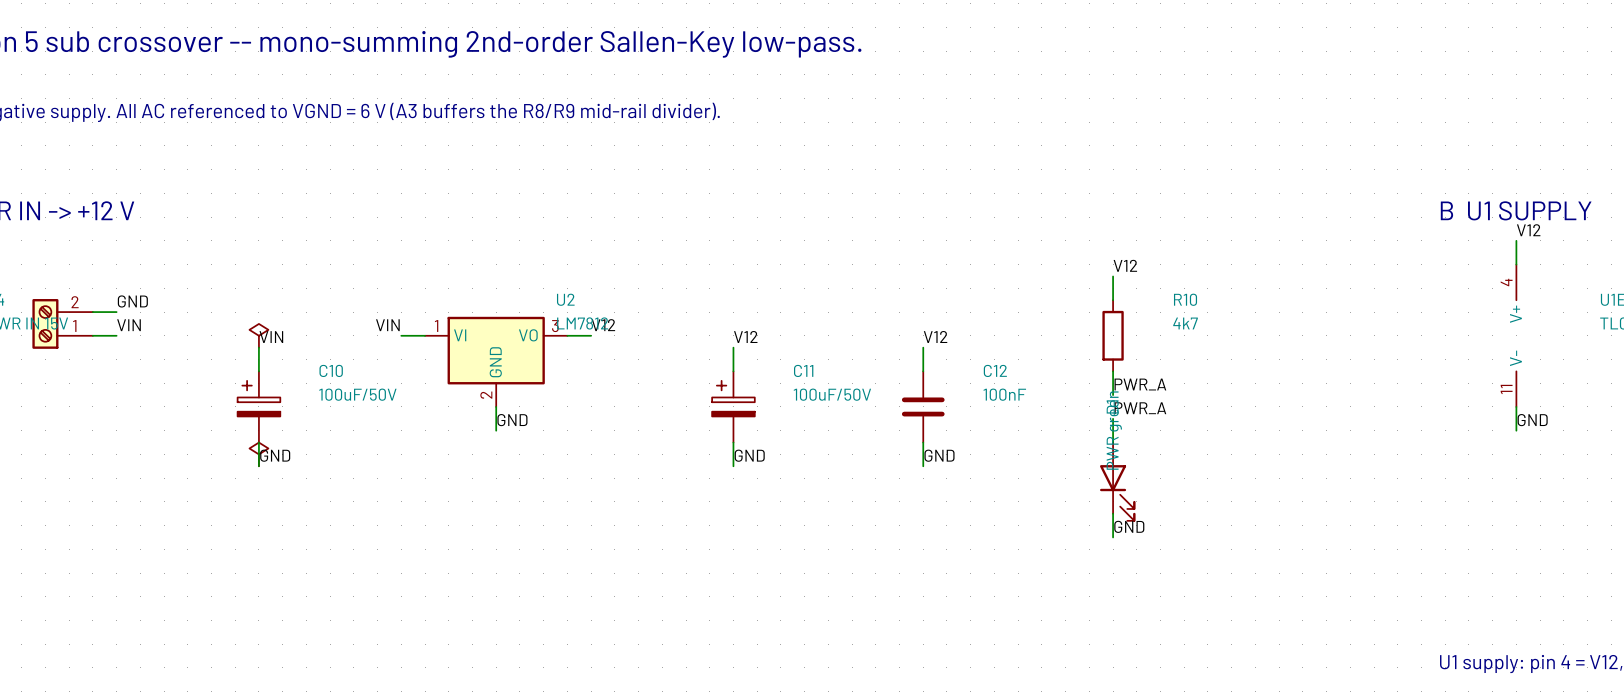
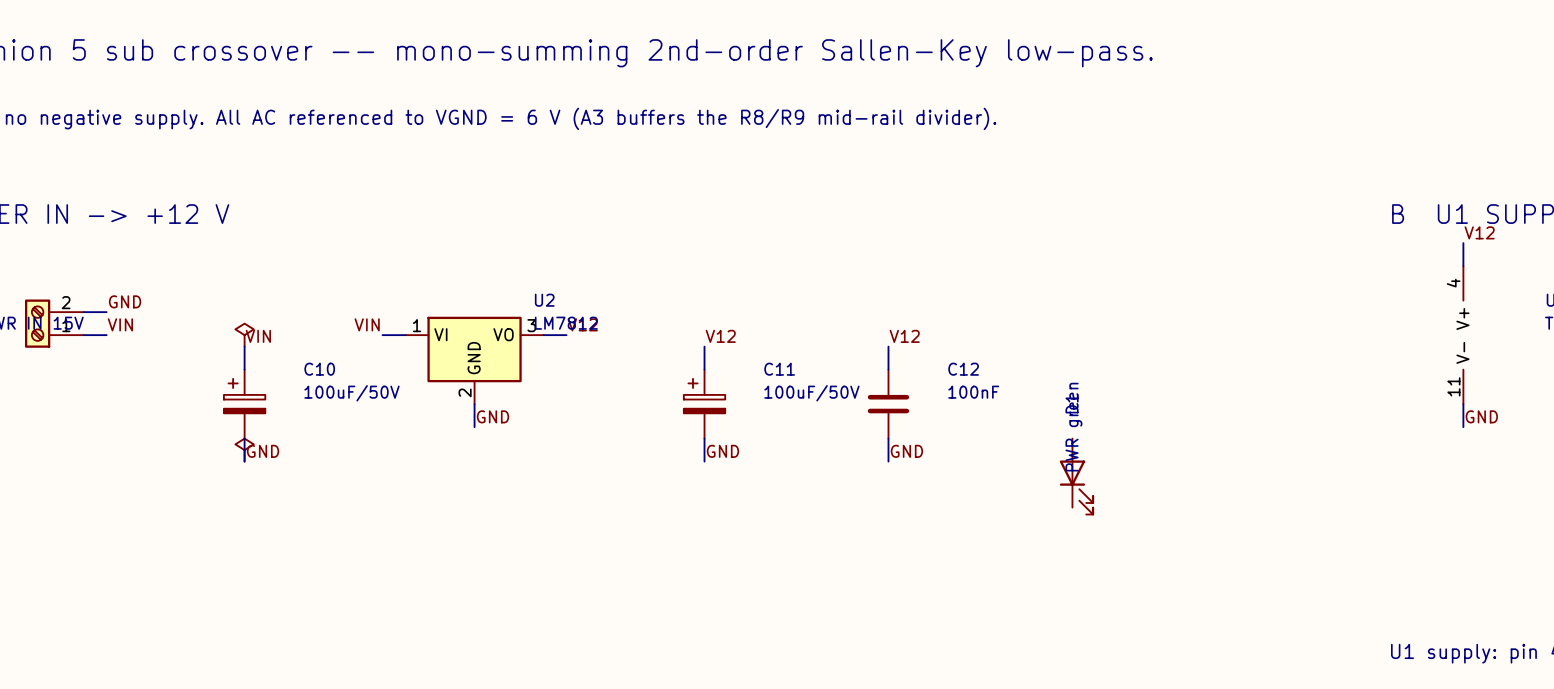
label: V12 (1125, 265) -> none
wire: (1113, 276) (1113, 300) -> none
R10: 4k7 (1113, 335) -> none
wire: (1113, 371) (1113, 395) -> none
label: PWR_A (1140, 384) -> none
label: PWR_A (1140, 408) -> none
wire: (1113, 418) (1113, 442) -> none
wire: (1113, 513) (1113, 537) -> none
label: GND (1129, 526) -> none

